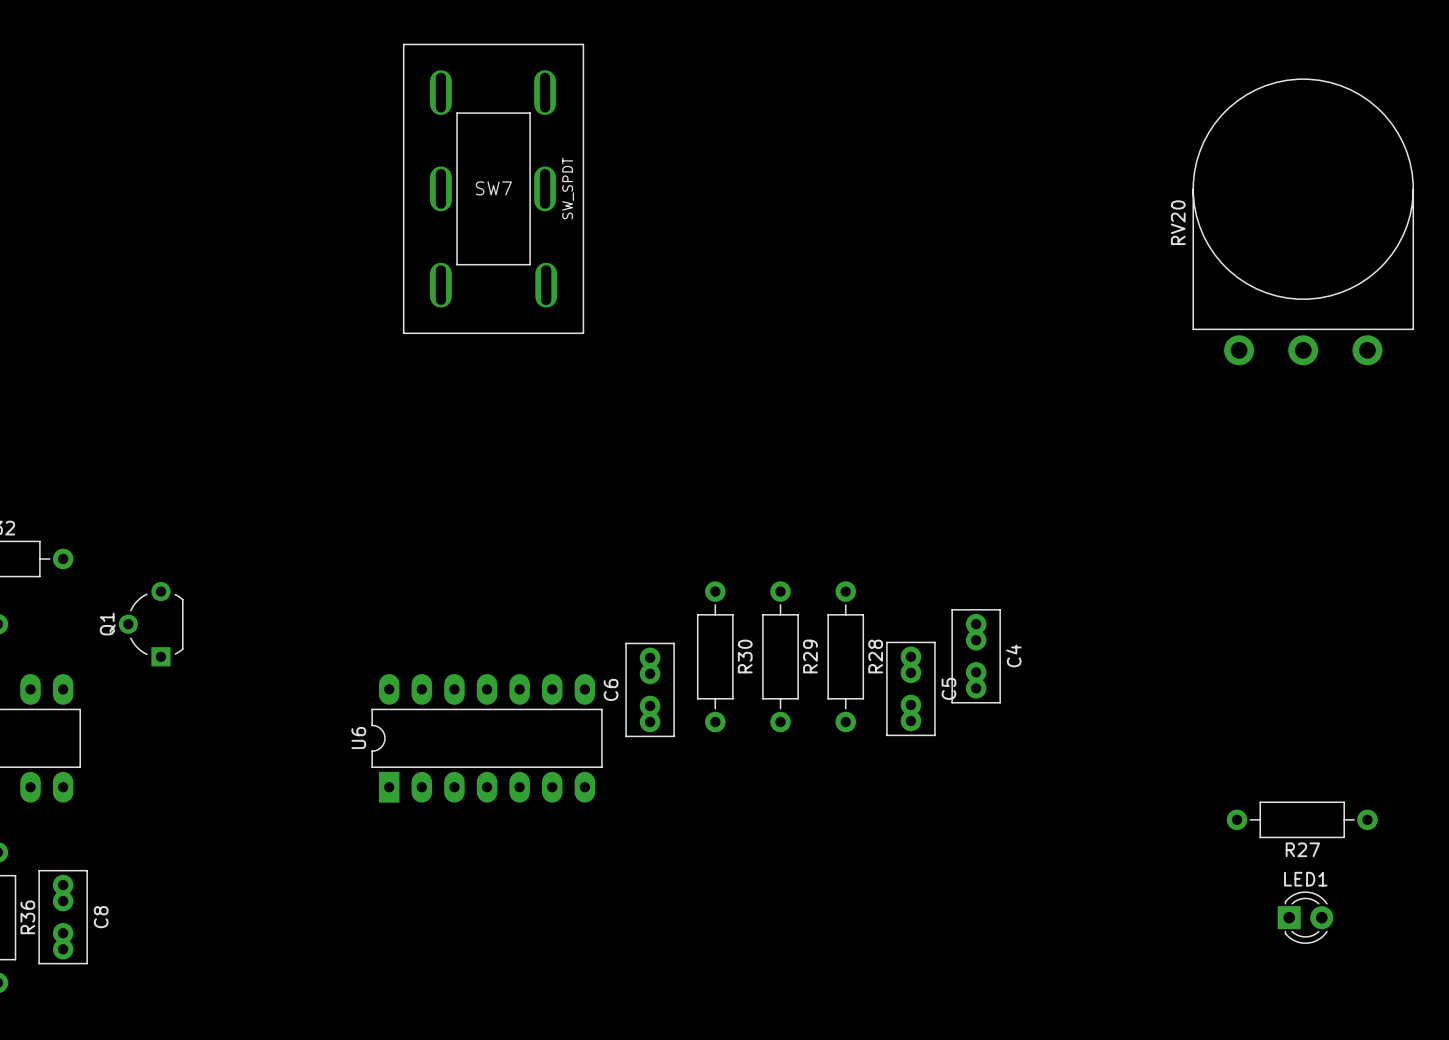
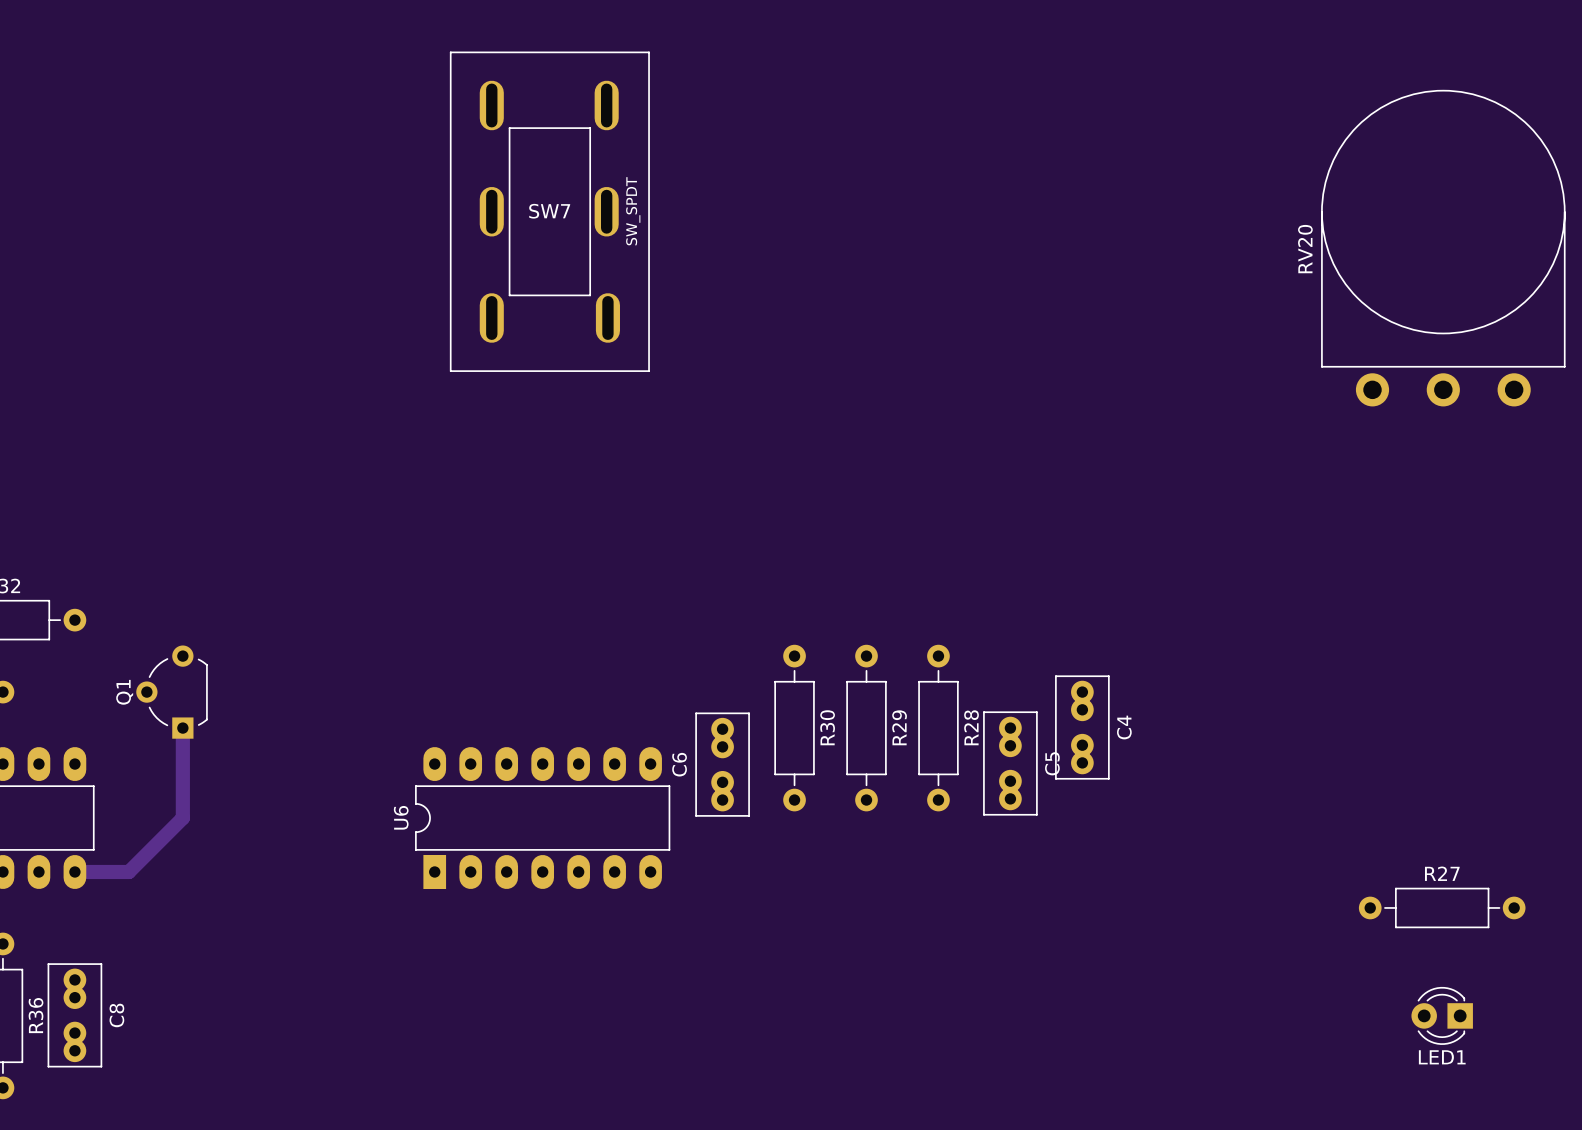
track: none -> (182, 728) (182, 818) (128, 871) (74, 871)
R27 name position: R27 (1302, 849) -> R27 (1442, 873)
LED1 rotation: 0° (1305, 917) -> 180° (1442, 1015)

